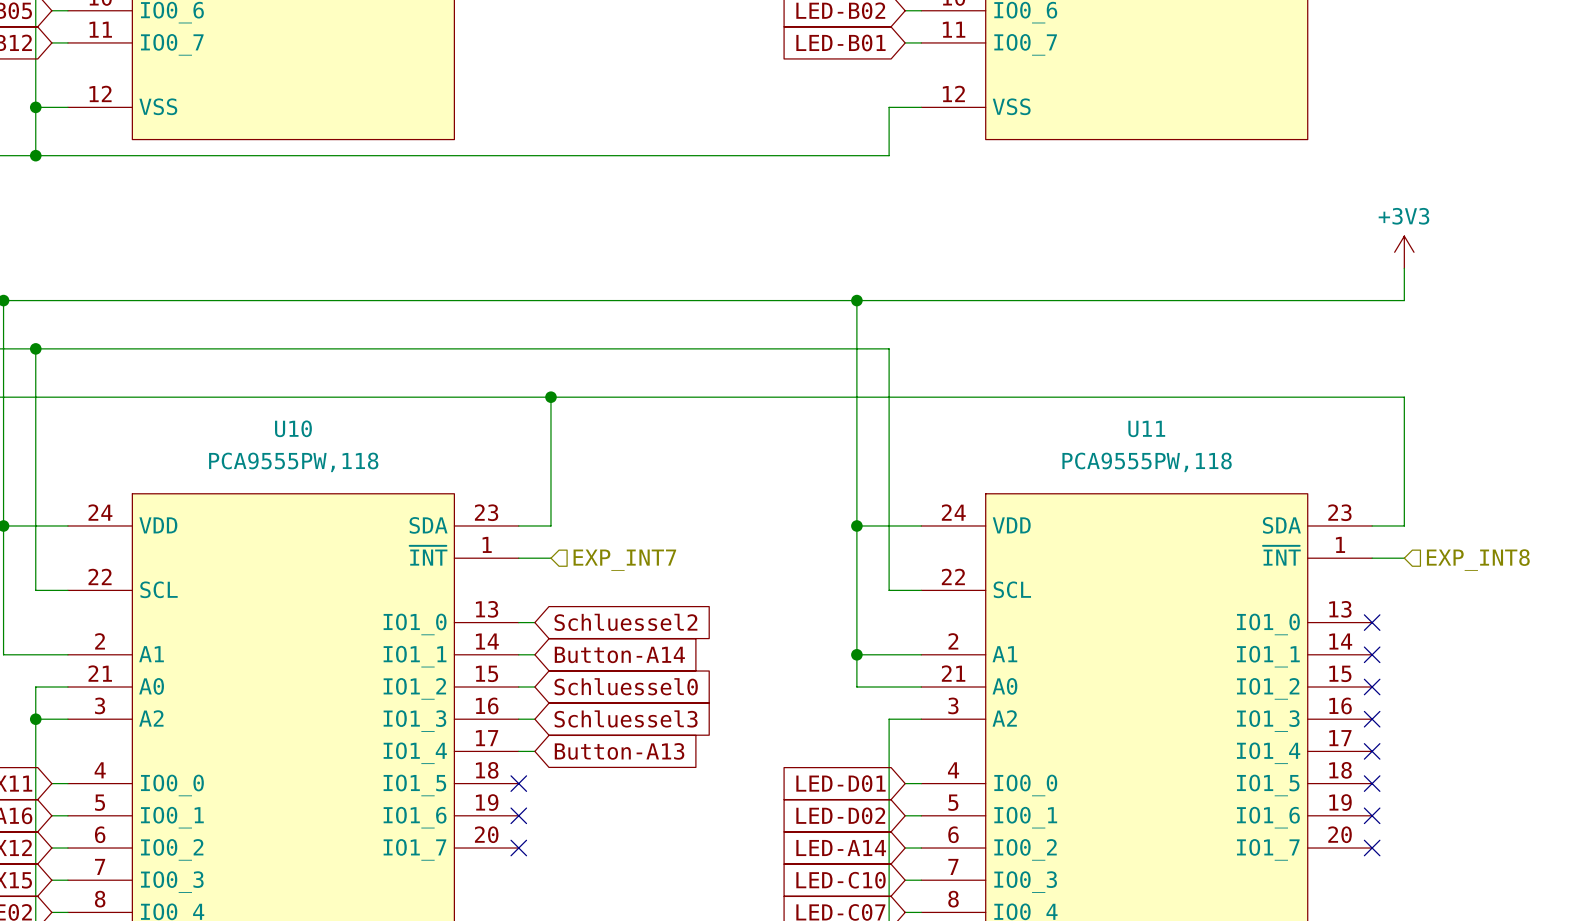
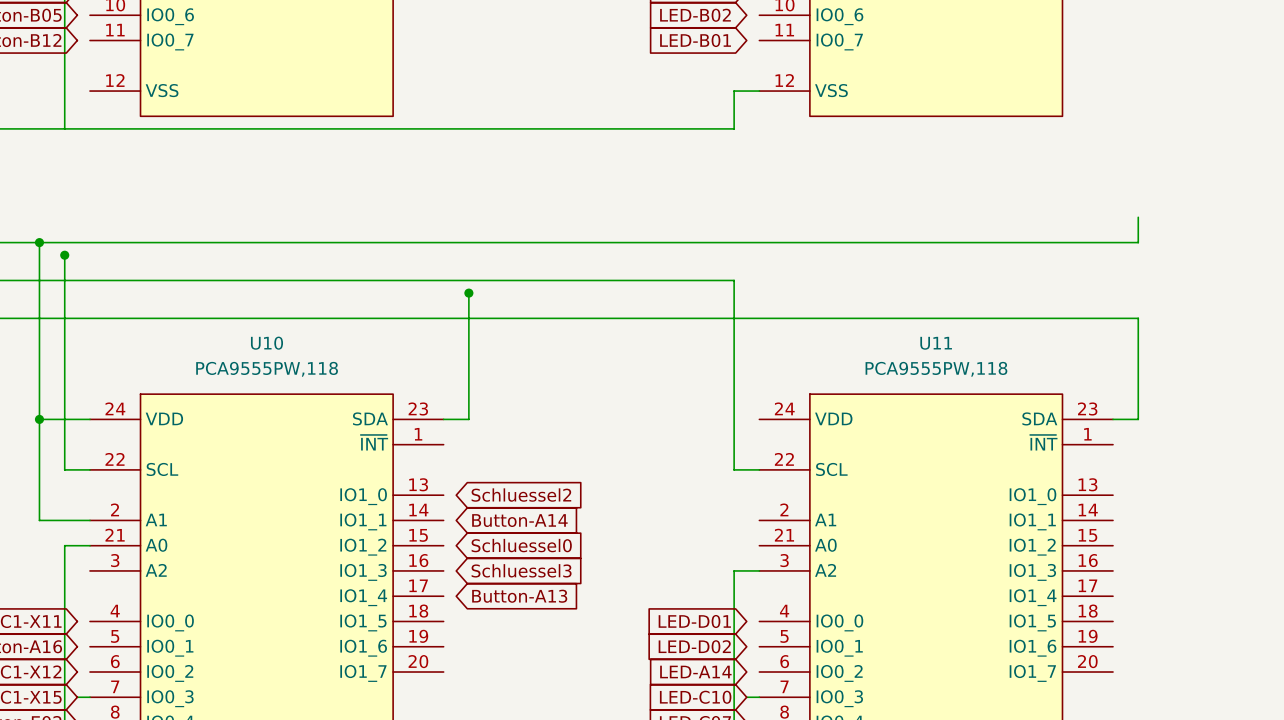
wire: (51, 10) (67, 10) -> none
wire: (905, 10) (921, 10) -> none
wire: (51, 42) (67, 42) -> none
wire: (905, 42) (921, 42) -> none
wire: (35, 107) (67, 107) -> none
junction: (35, 107) -> none
junction: (35, 155) -> none
power symbol: +3V3 (1404, 252) -> none
wire: (856, 300) (856, 687) (921, 687) -> none
junction: (856, 300) -> none
wire: none -> (64, 255) (64, 280)
junction position: (35, 348) -> (64, 255)
wire: none -> (468, 293) (468, 318)
junction position: (550, 397) -> (468, 293)
wire: (856, 525) (921, 525) -> none
junction: (856, 525) -> none
wire: (518, 558) (550, 558) -> none
wire: (1372, 558) (1404, 558) -> none
hierarchical label: EXP_INT7 (624, 560) -> none
hierarchical label: EXP_INT8 (1478, 560) -> none
wire: (518, 622) (534, 622) -> none
no-connect mark: (1372, 622) -> none
wire: (518, 654) (534, 654) -> none
wire: (856, 654) (921, 654) -> none
junction: (856, 654) -> none
no-connect mark: (1372, 654) -> none
wire: (518, 687) (534, 687) -> none
no-connect mark: (1372, 687) -> none
wire: (35, 719) (67, 719) -> none
junction: (35, 719) -> none
wire: (518, 719) (534, 719) -> none
no-connect mark: (1372, 719) -> none
wire: (518, 751) (534, 751) -> none
no-connect mark: (1372, 751) -> none
wire: (51, 783) (67, 783) -> none
no-connect mark: (518, 783) -> none
wire: (905, 783) (921, 783) -> none
no-connect mark: (1372, 783) -> none
wire: (51, 815) (67, 815) -> none
no-connect mark: (518, 815) -> none
wire: (905, 815) (921, 815) -> none
no-connect mark: (1372, 815) -> none
wire: (51, 848) (67, 848) -> none
no-connect mark: (518, 848) -> none
wire: (905, 848) (921, 848) -> none
no-connect mark: (1372, 848) -> none

